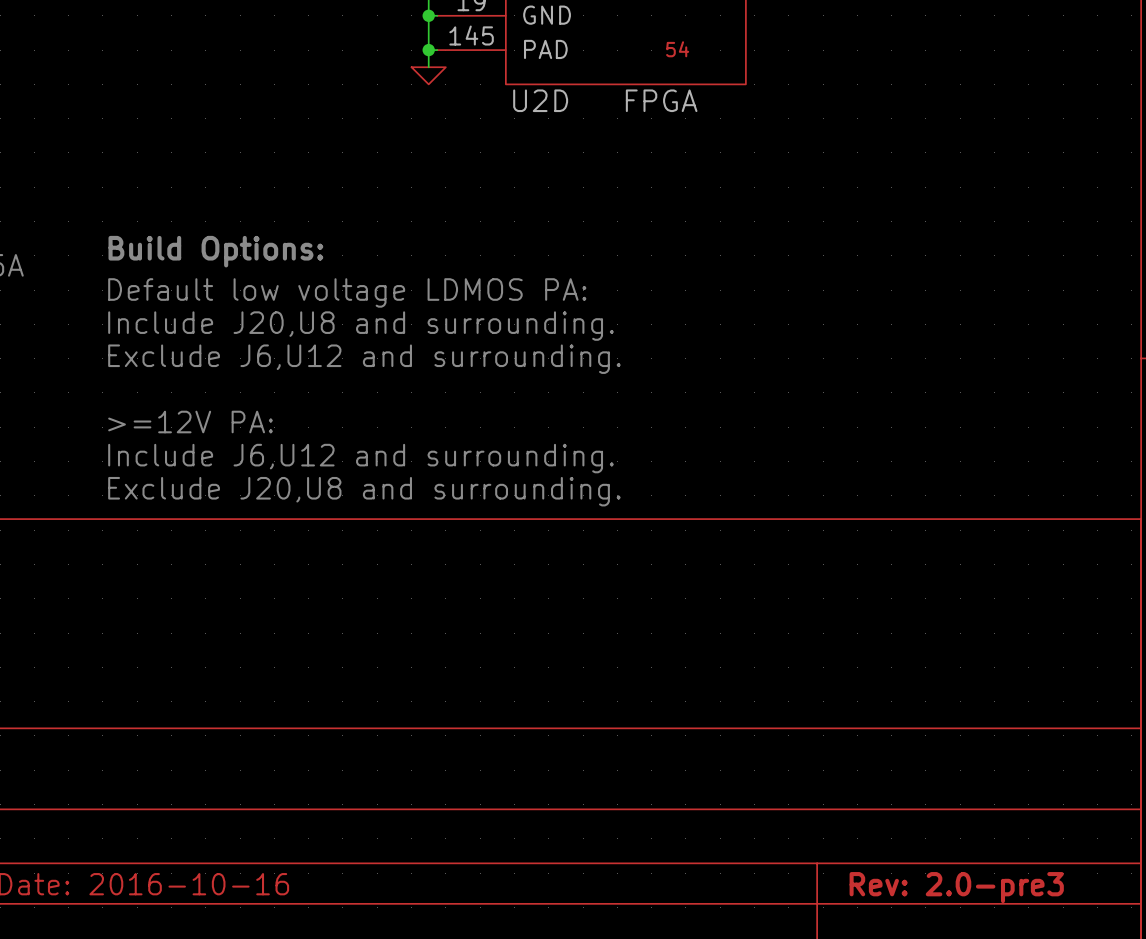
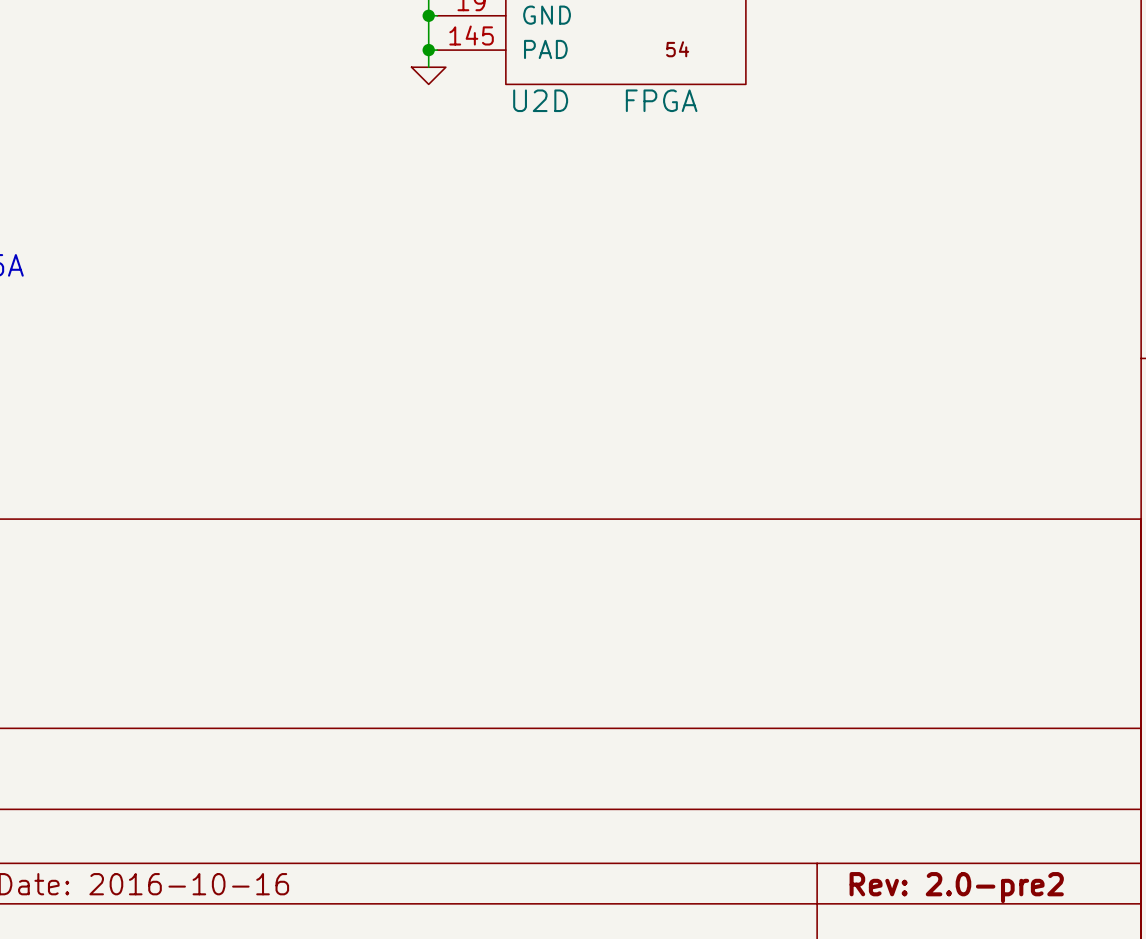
text: Build Options: (215, 251) -> none
text: Default low voltage LDMOS PA: (347, 292) -> none
text: Include J20,U8 and surrounding. (360, 326) -> none
text: Exclude J6,U12 and surrounding. (364, 359) -> none
text: >=12V PA: (190, 422) -> none
text: Include J6,U12 and surrounding. (360, 458) -> none
text: Exclude J20,U8 and surrounding. (364, 491) -> none
title block: Rev: 2.0-pre3 (956, 887) -> Rev: 2.0-pre2 (956, 887)

